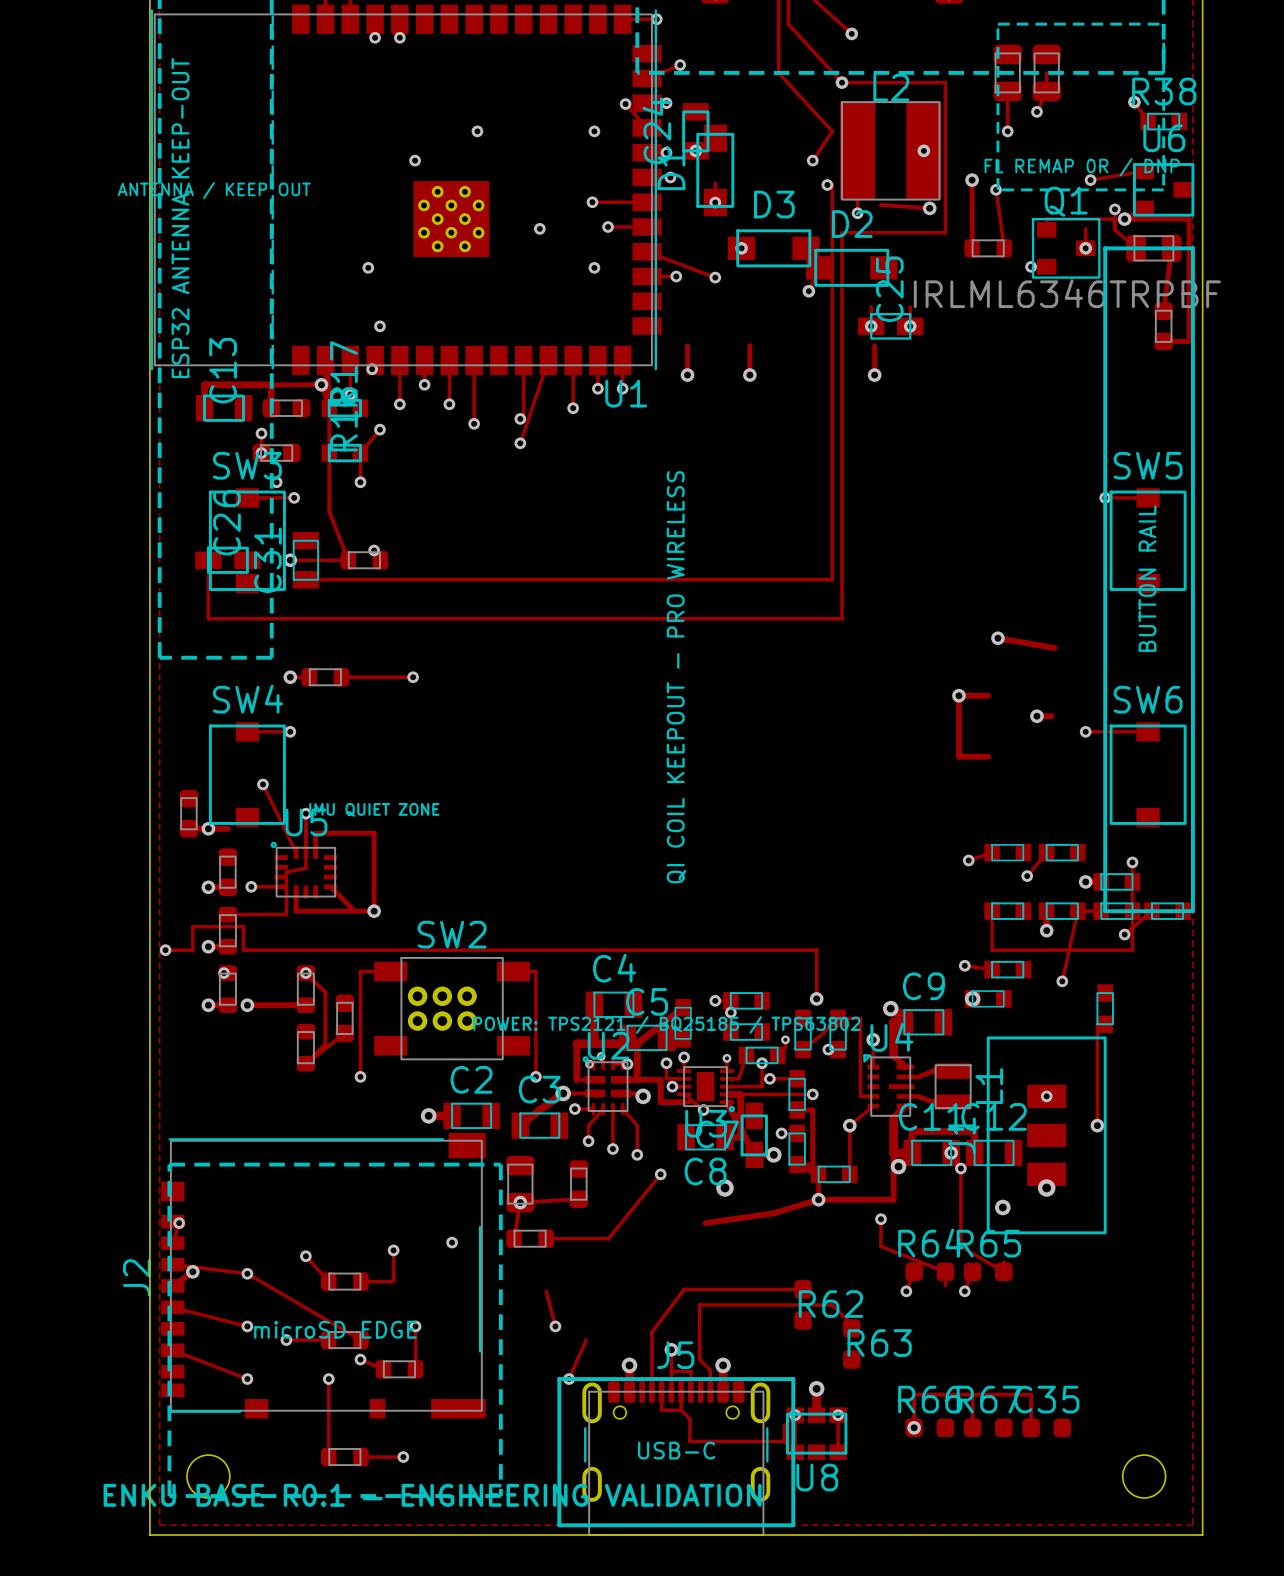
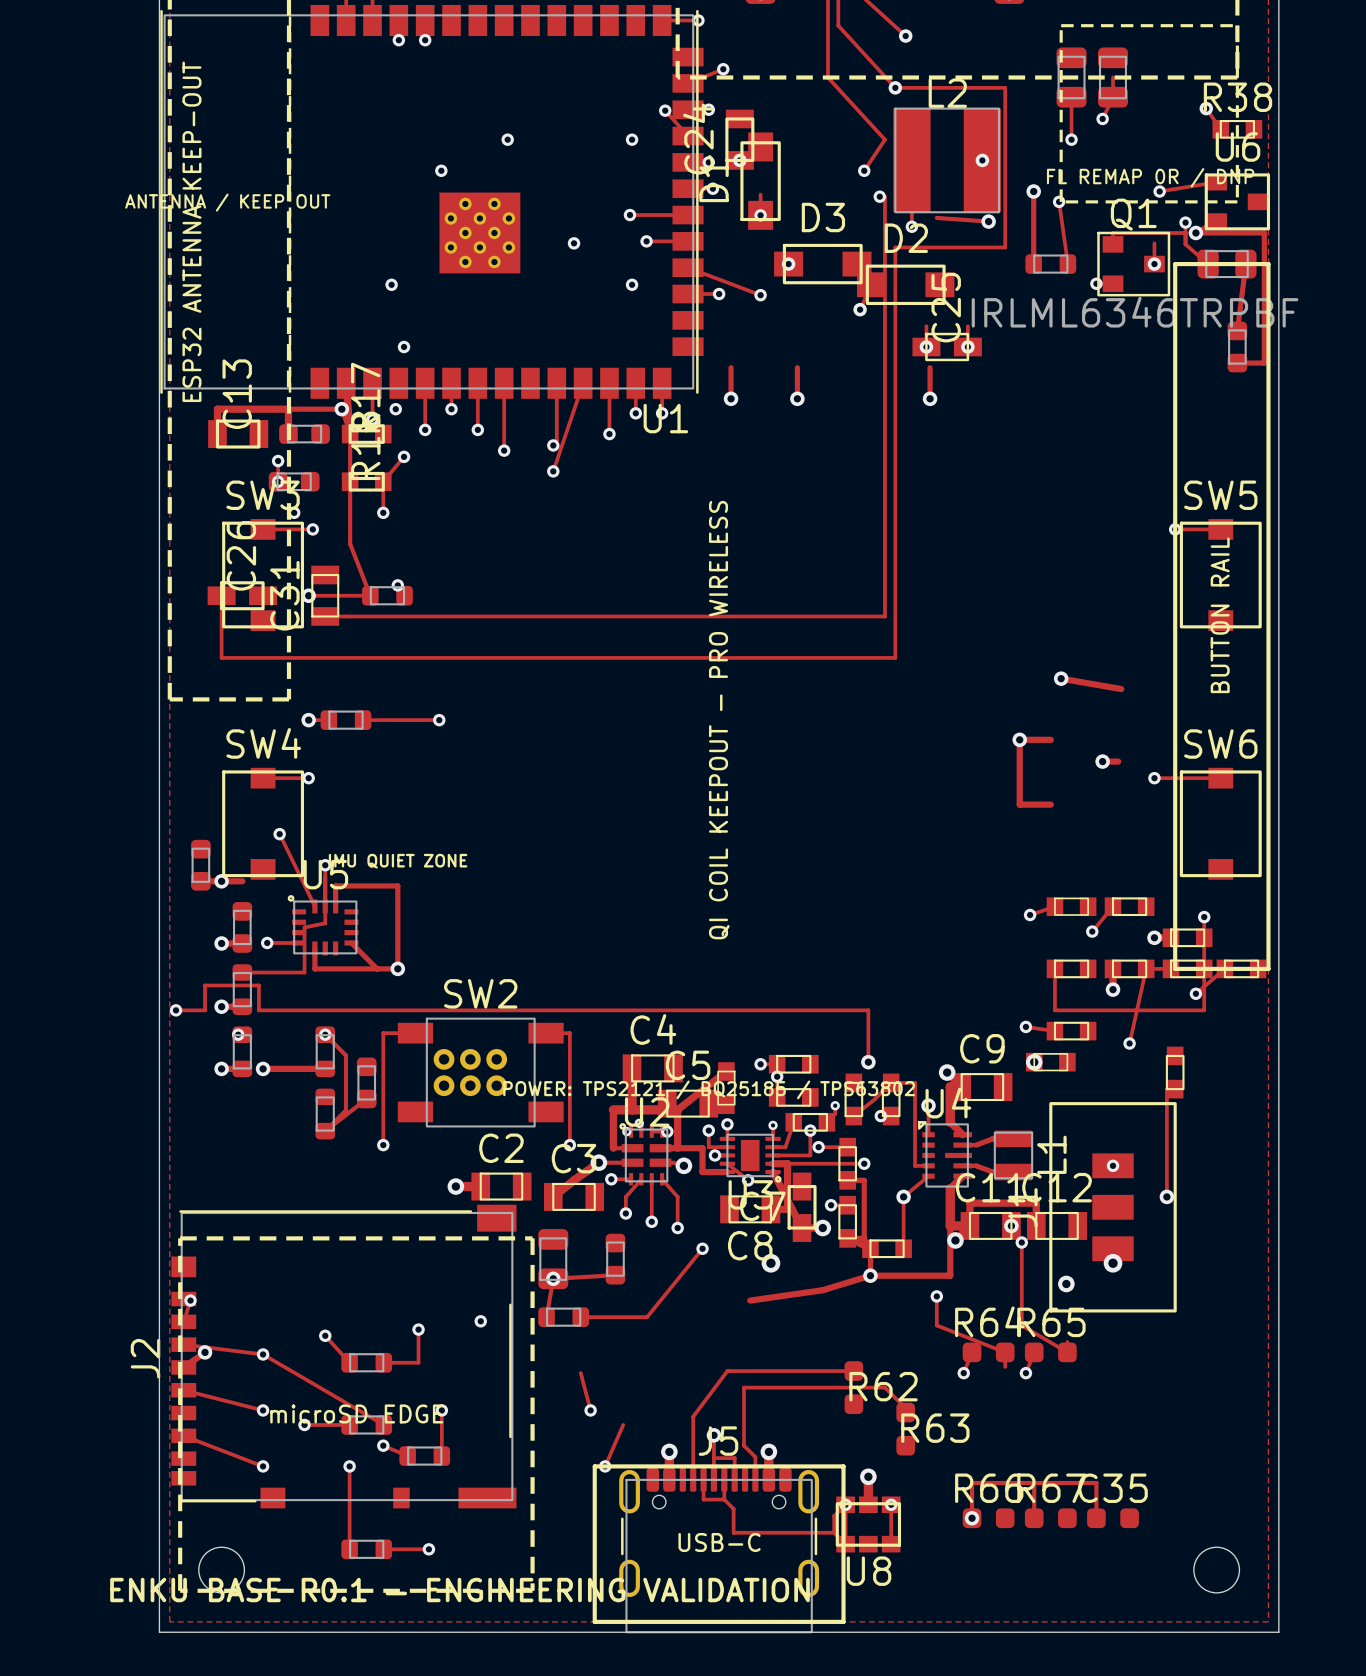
via position: (372, 369) -> (395, 409)

